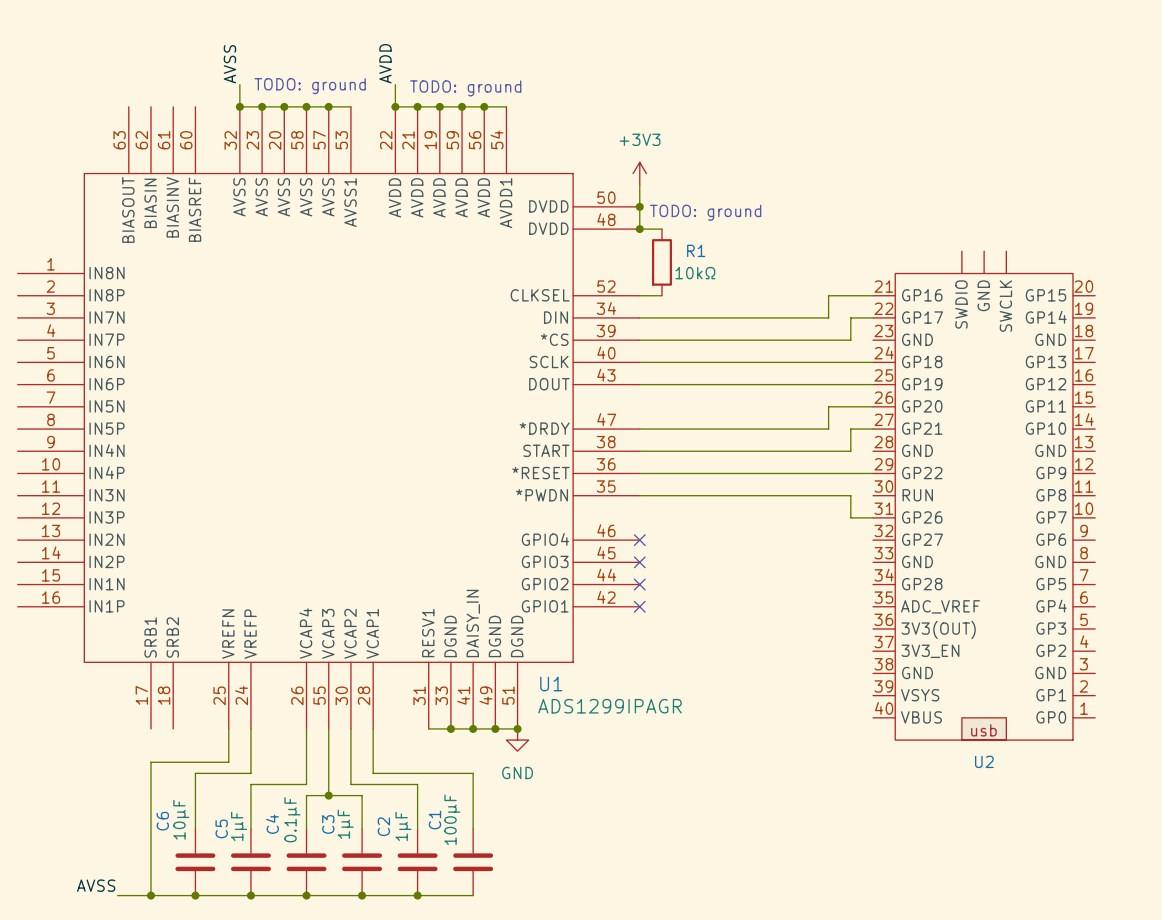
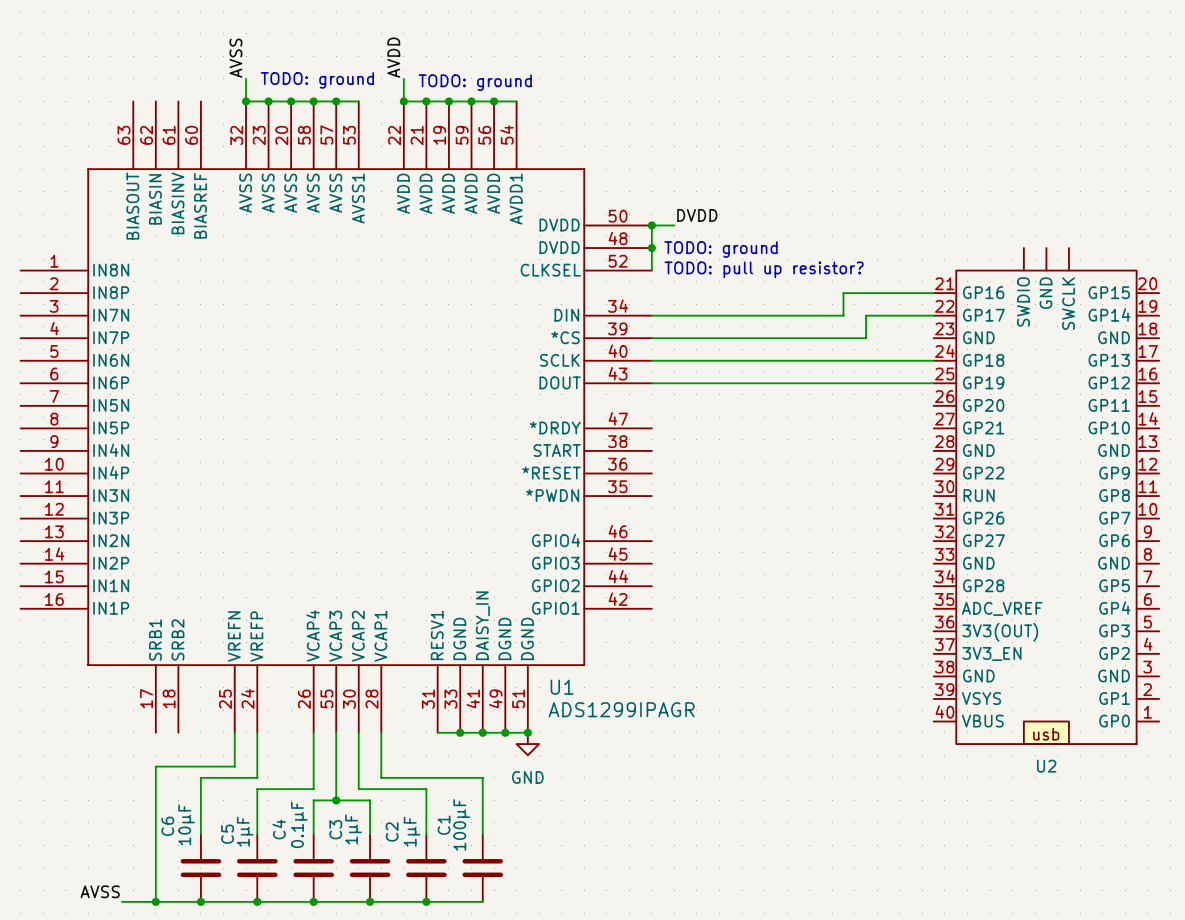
U1 symbol: [17, 106, 640, 729] -> [20, 101, 652, 733]
power symbol: +3V3 (639, 173) -> none
wire: (639, 184) (639, 229) -> (651, 270) (651, 225)
junction position: (639, 206) -> (651, 248)
text position: TODO: ground (705, 212) -> TODO: ground (720, 249)
label: none -> DVDD (697, 215)
R1: 10kΩ (661, 262) -> none
text: none -> TODO: pull up resistor? (764, 269)
wire: (639, 295) (661, 295) -> none
wire: (873, 406) (828, 406) (828, 429) (639, 429) -> none
wire: (873, 429) (850, 429) (850, 451) (639, 451) -> none
wire: (639, 473) (873, 473) -> none
wire: (639, 495) (850, 495) (850, 517) (873, 517) -> none
U2 position: (984, 495) -> (1046, 496)
no-connect mark: (639, 540) -> none
no-connect mark: (639, 562) -> none
no-connect mark: (639, 584) -> none
no-connect mark: (639, 606) -> none

